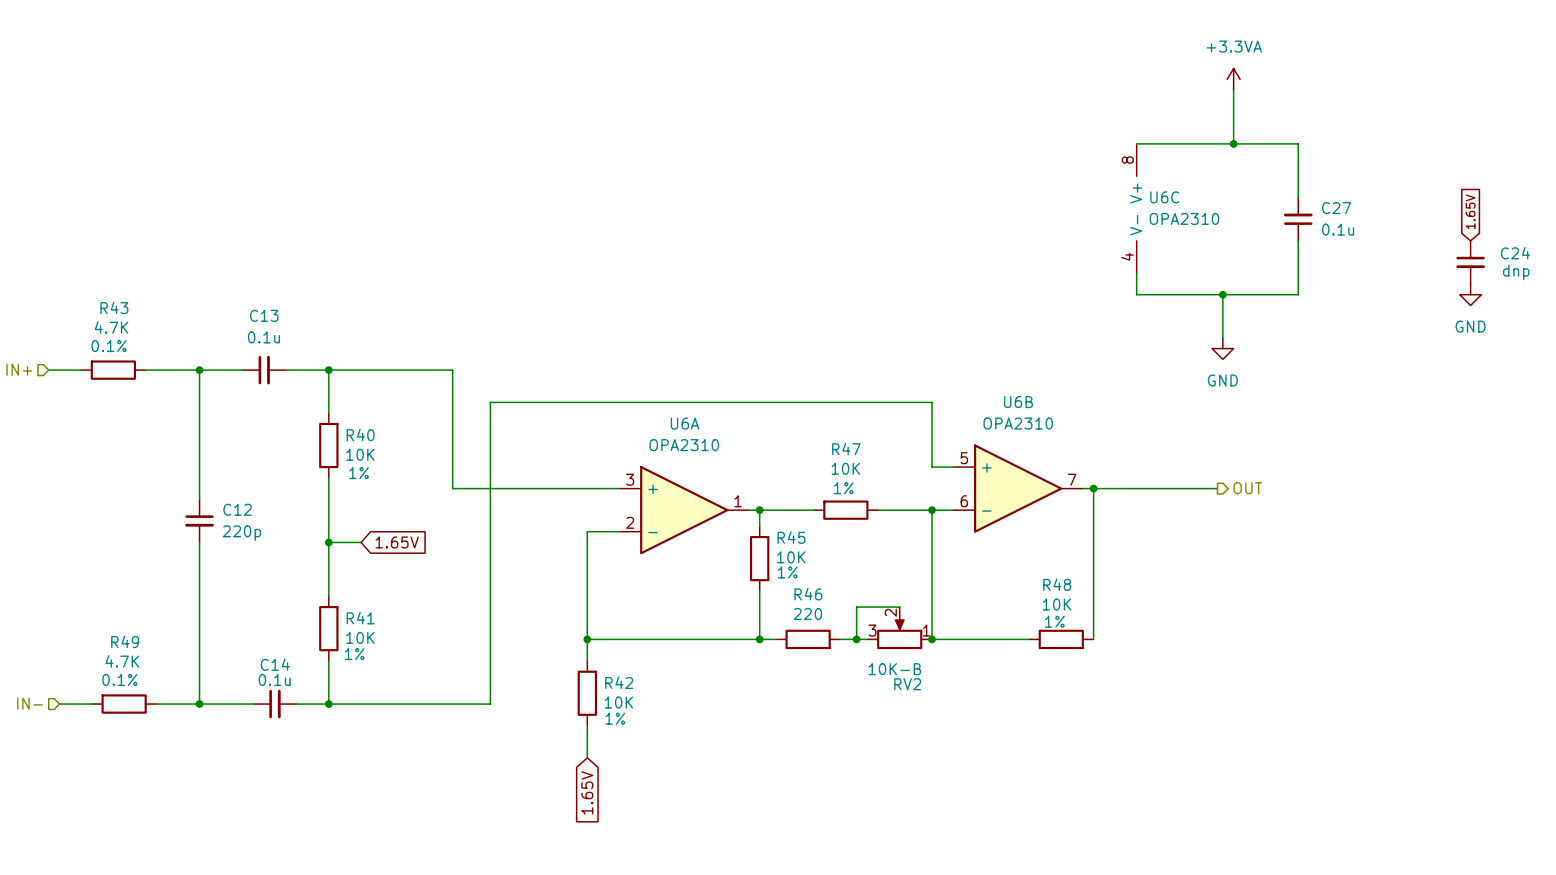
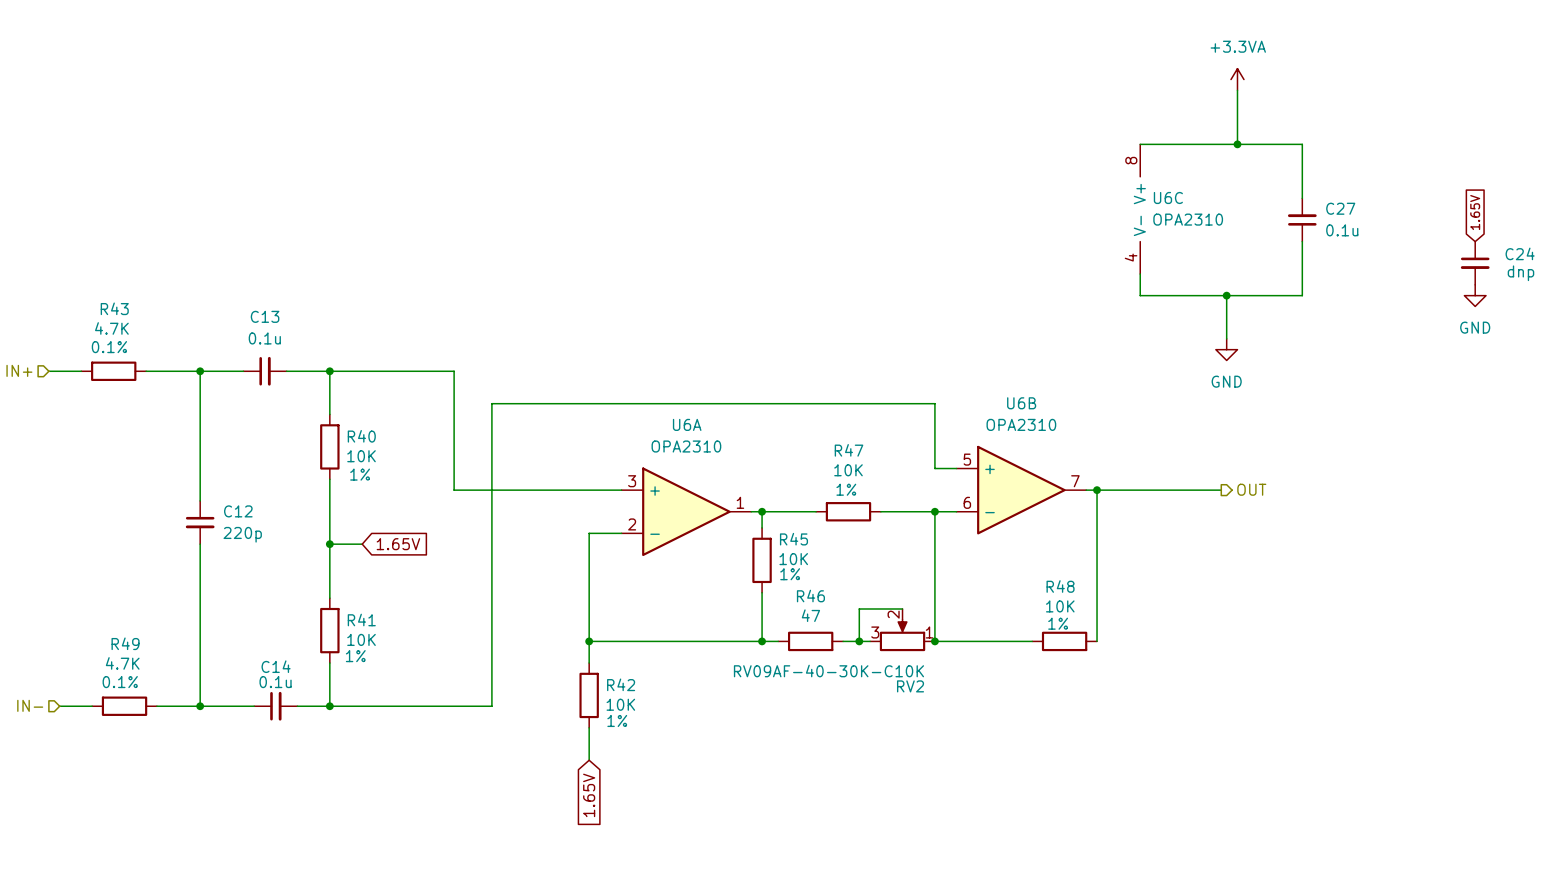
R46 value: 220 (807, 614) -> 47 (810, 615)
RV2 value: 10K-B (894, 669) -> RV09AF-40-30K-C10K (828, 671)

